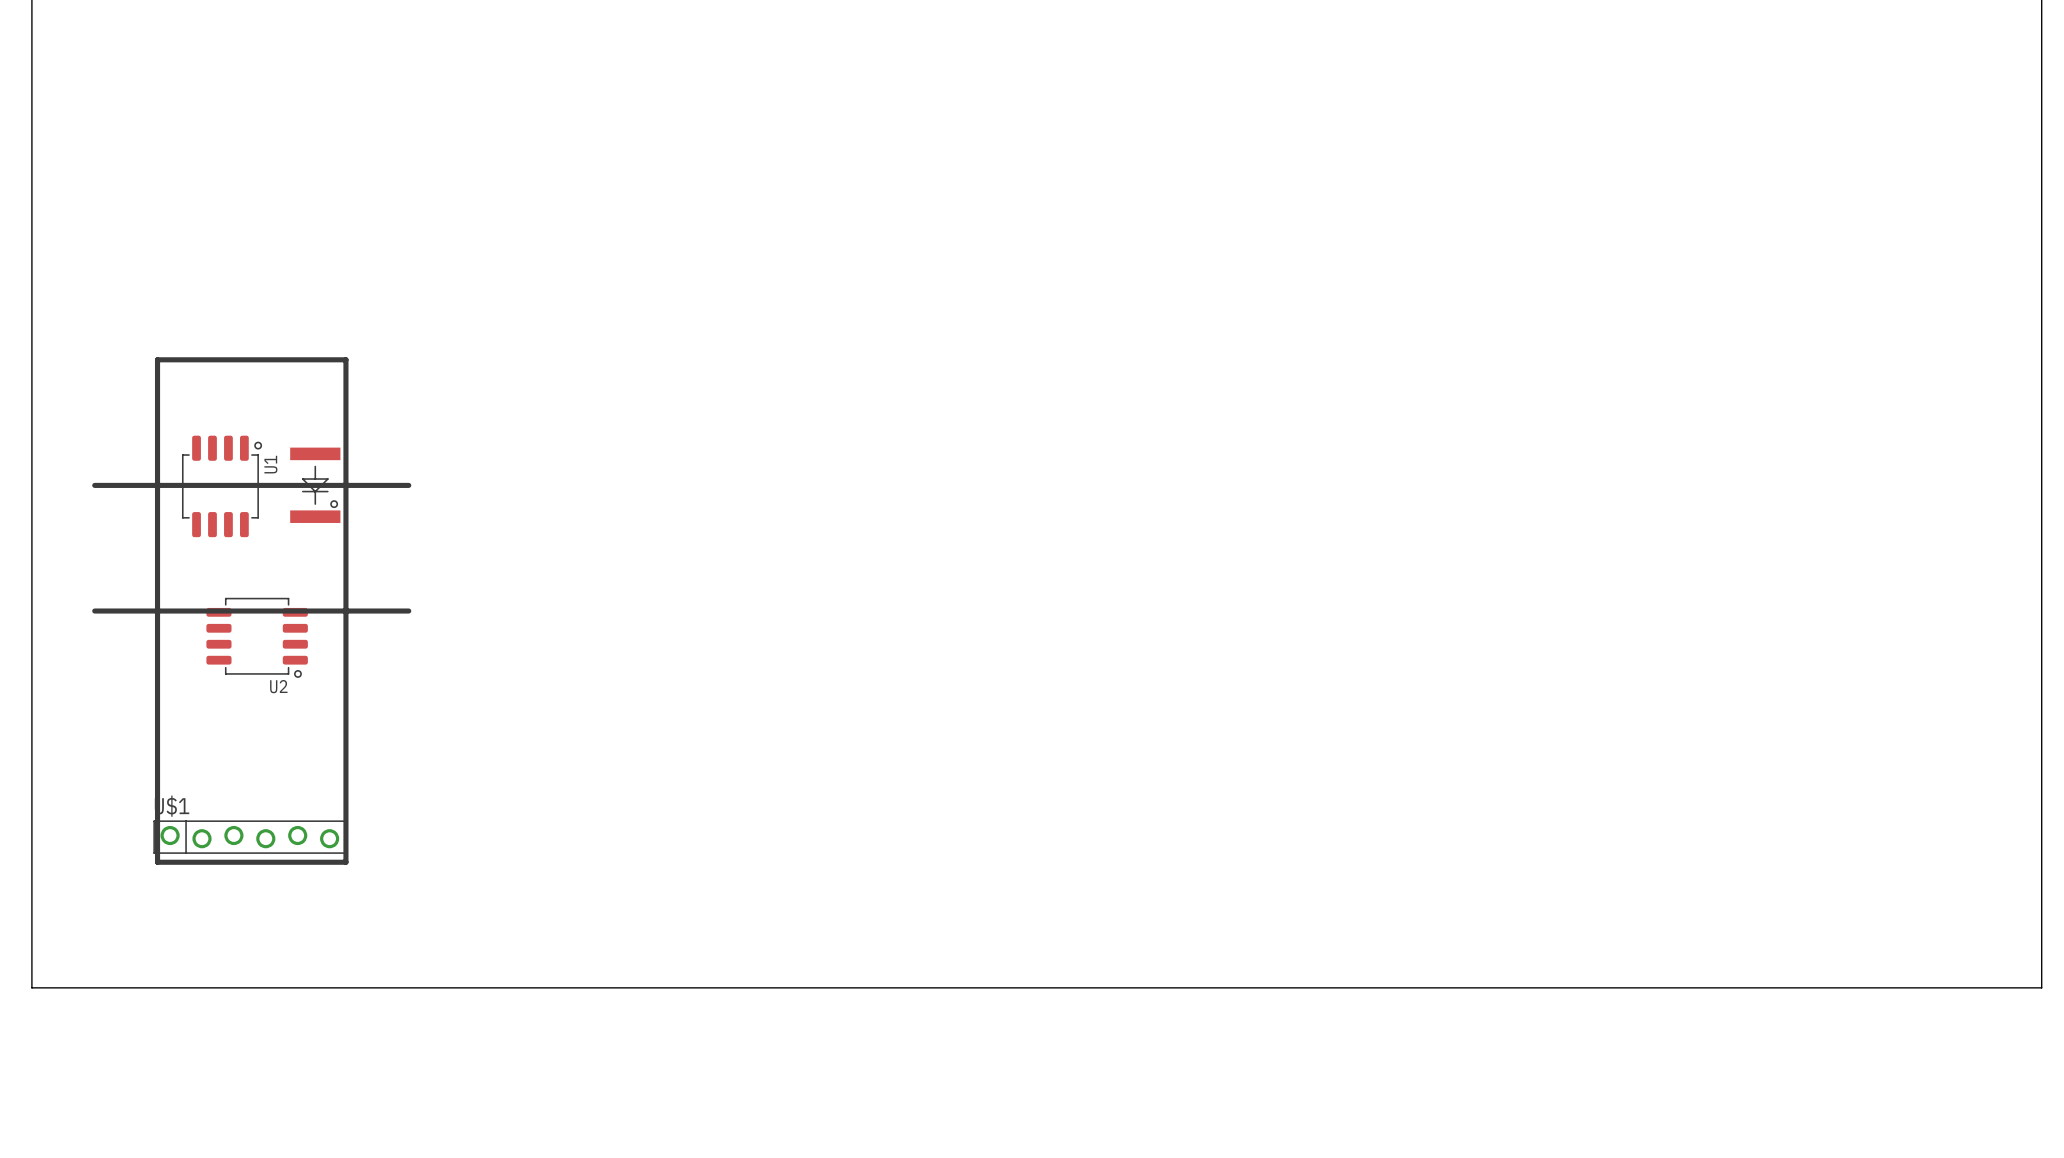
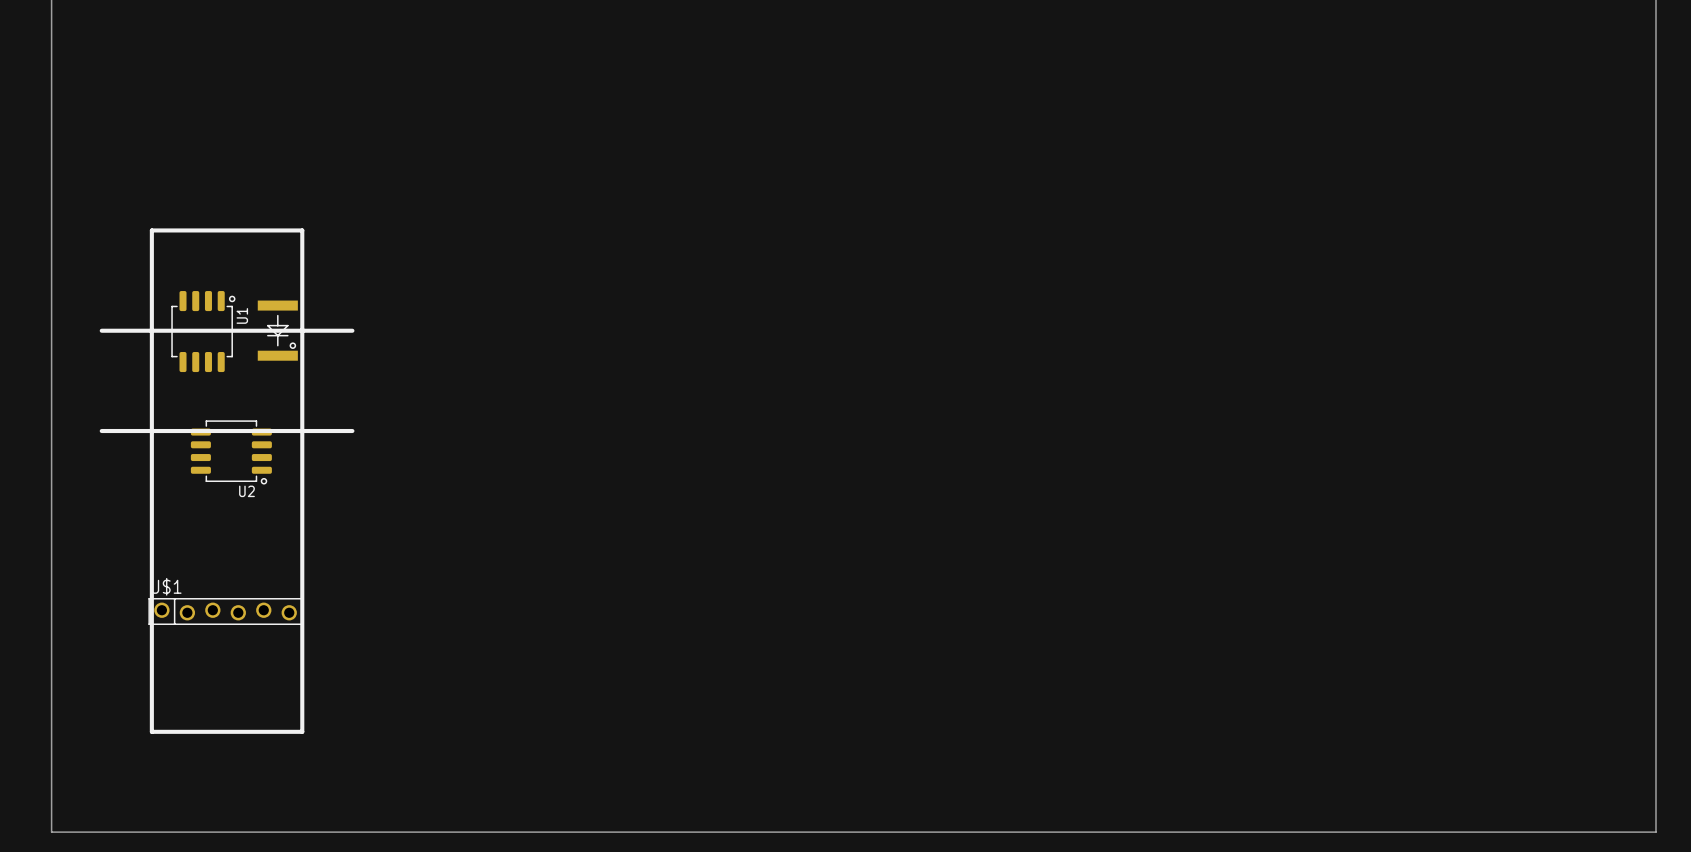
line: (157, 862) (345, 862) -> (151, 631) (151, 731) (302, 731) (302, 631)
board edge: (31, 987) (2041, 987) -> (51, 731) (51, 832) (1655, 832) (1655, 731)

